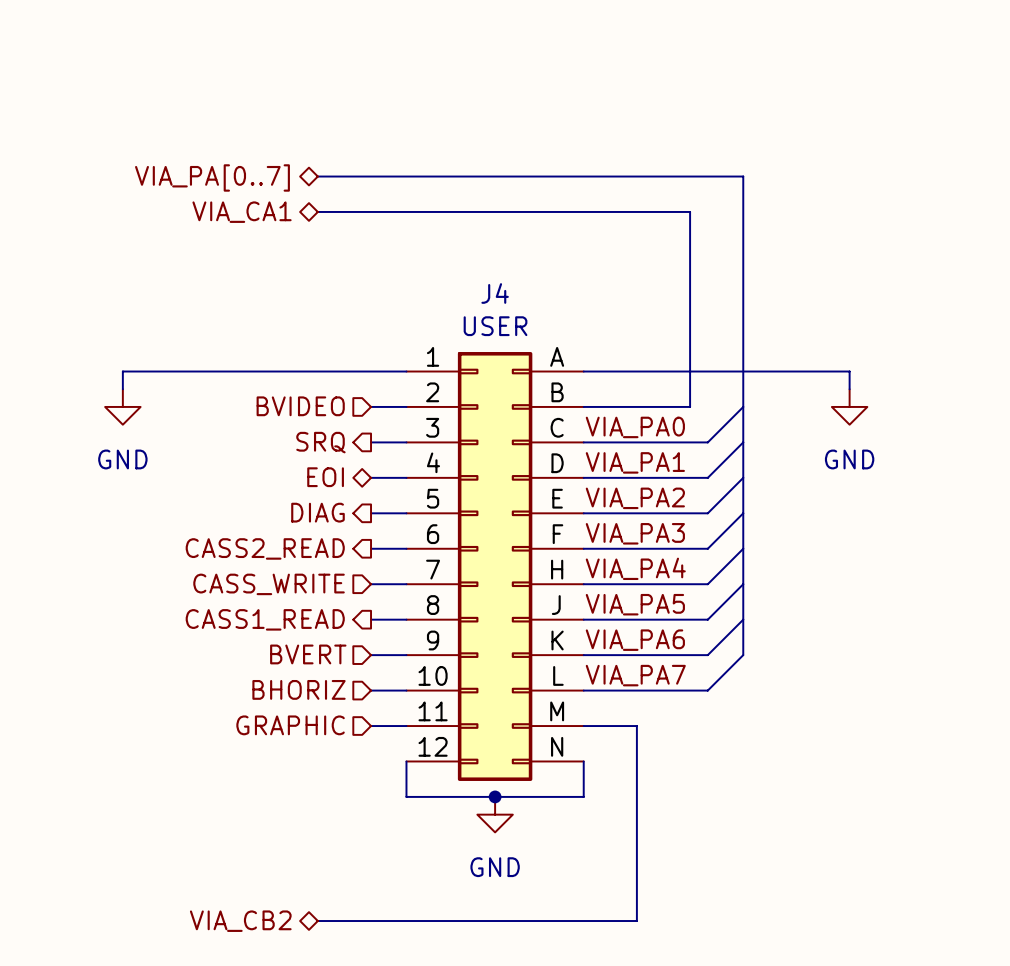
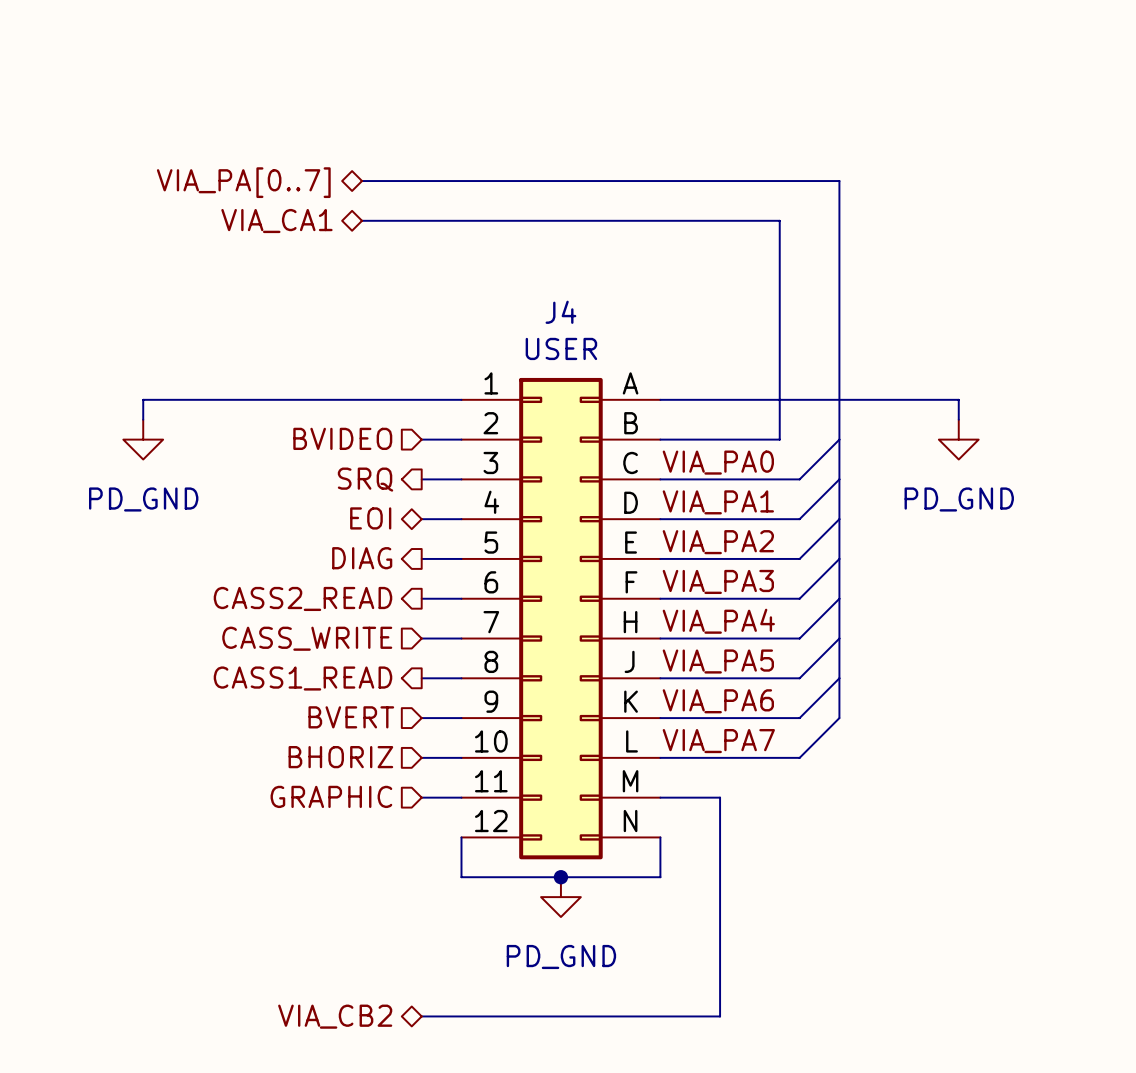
power symbol: GND (122, 406) -> PD_GND (143, 439)
power symbol: GND (849, 406) -> PD_GND (958, 439)
power symbol: GND (495, 814) -> PD_GND (560, 897)
hierarchical label position: VIA_CB2 (240, 921) -> VIA_CB2 (335, 1016)
wire: (317, 921) (371, 921) -> none

